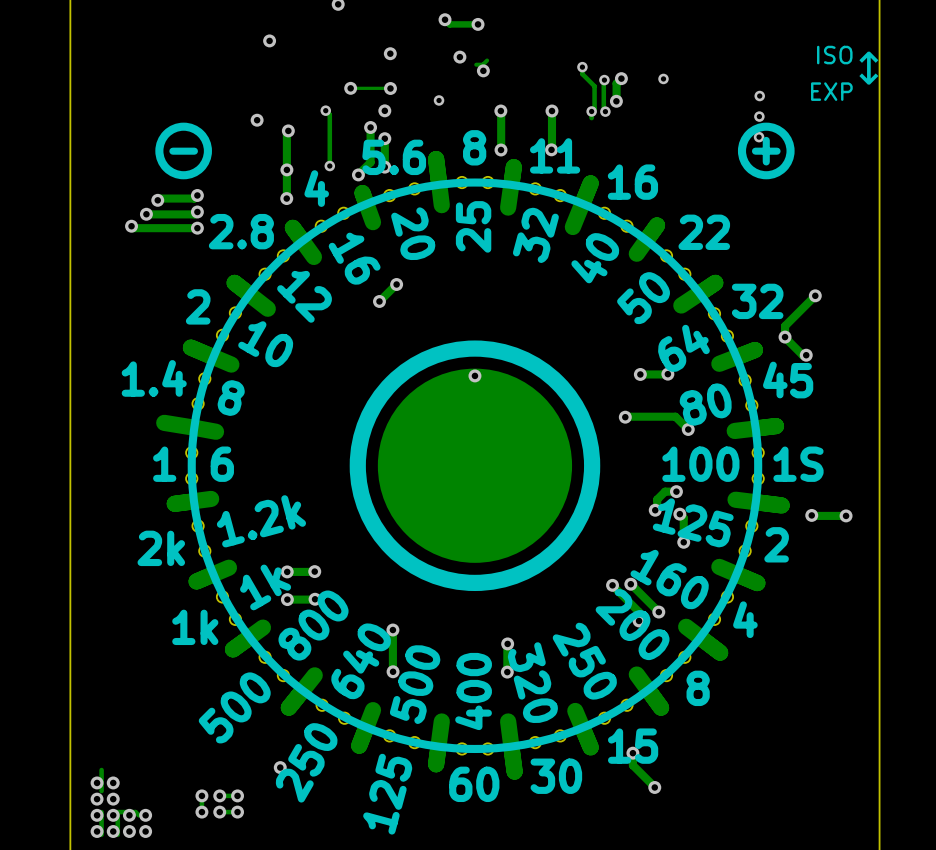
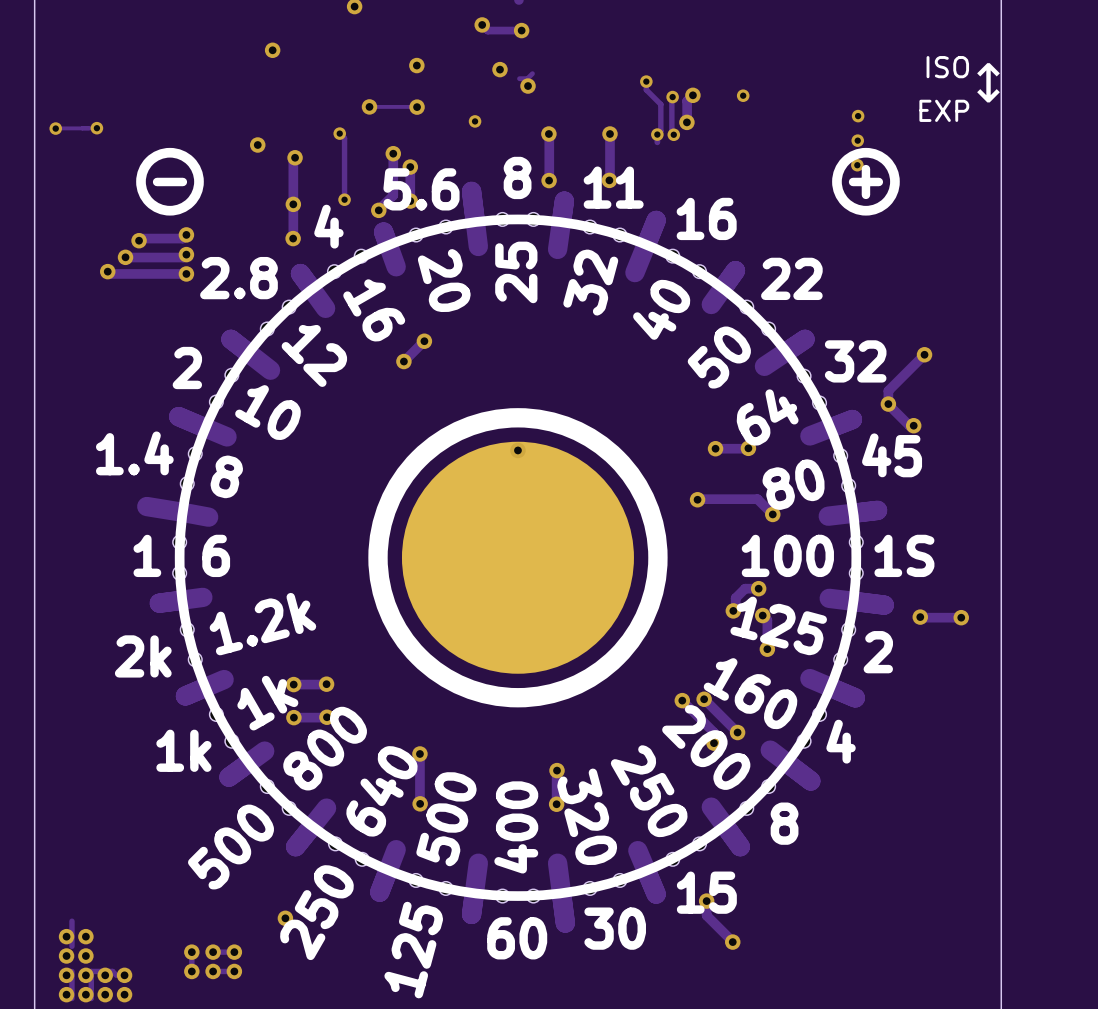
via: none -> (55, 128)
track: none -> (96, 128) (55, 128)
via: none -> (96, 128)
via: (384, 110) -> none

